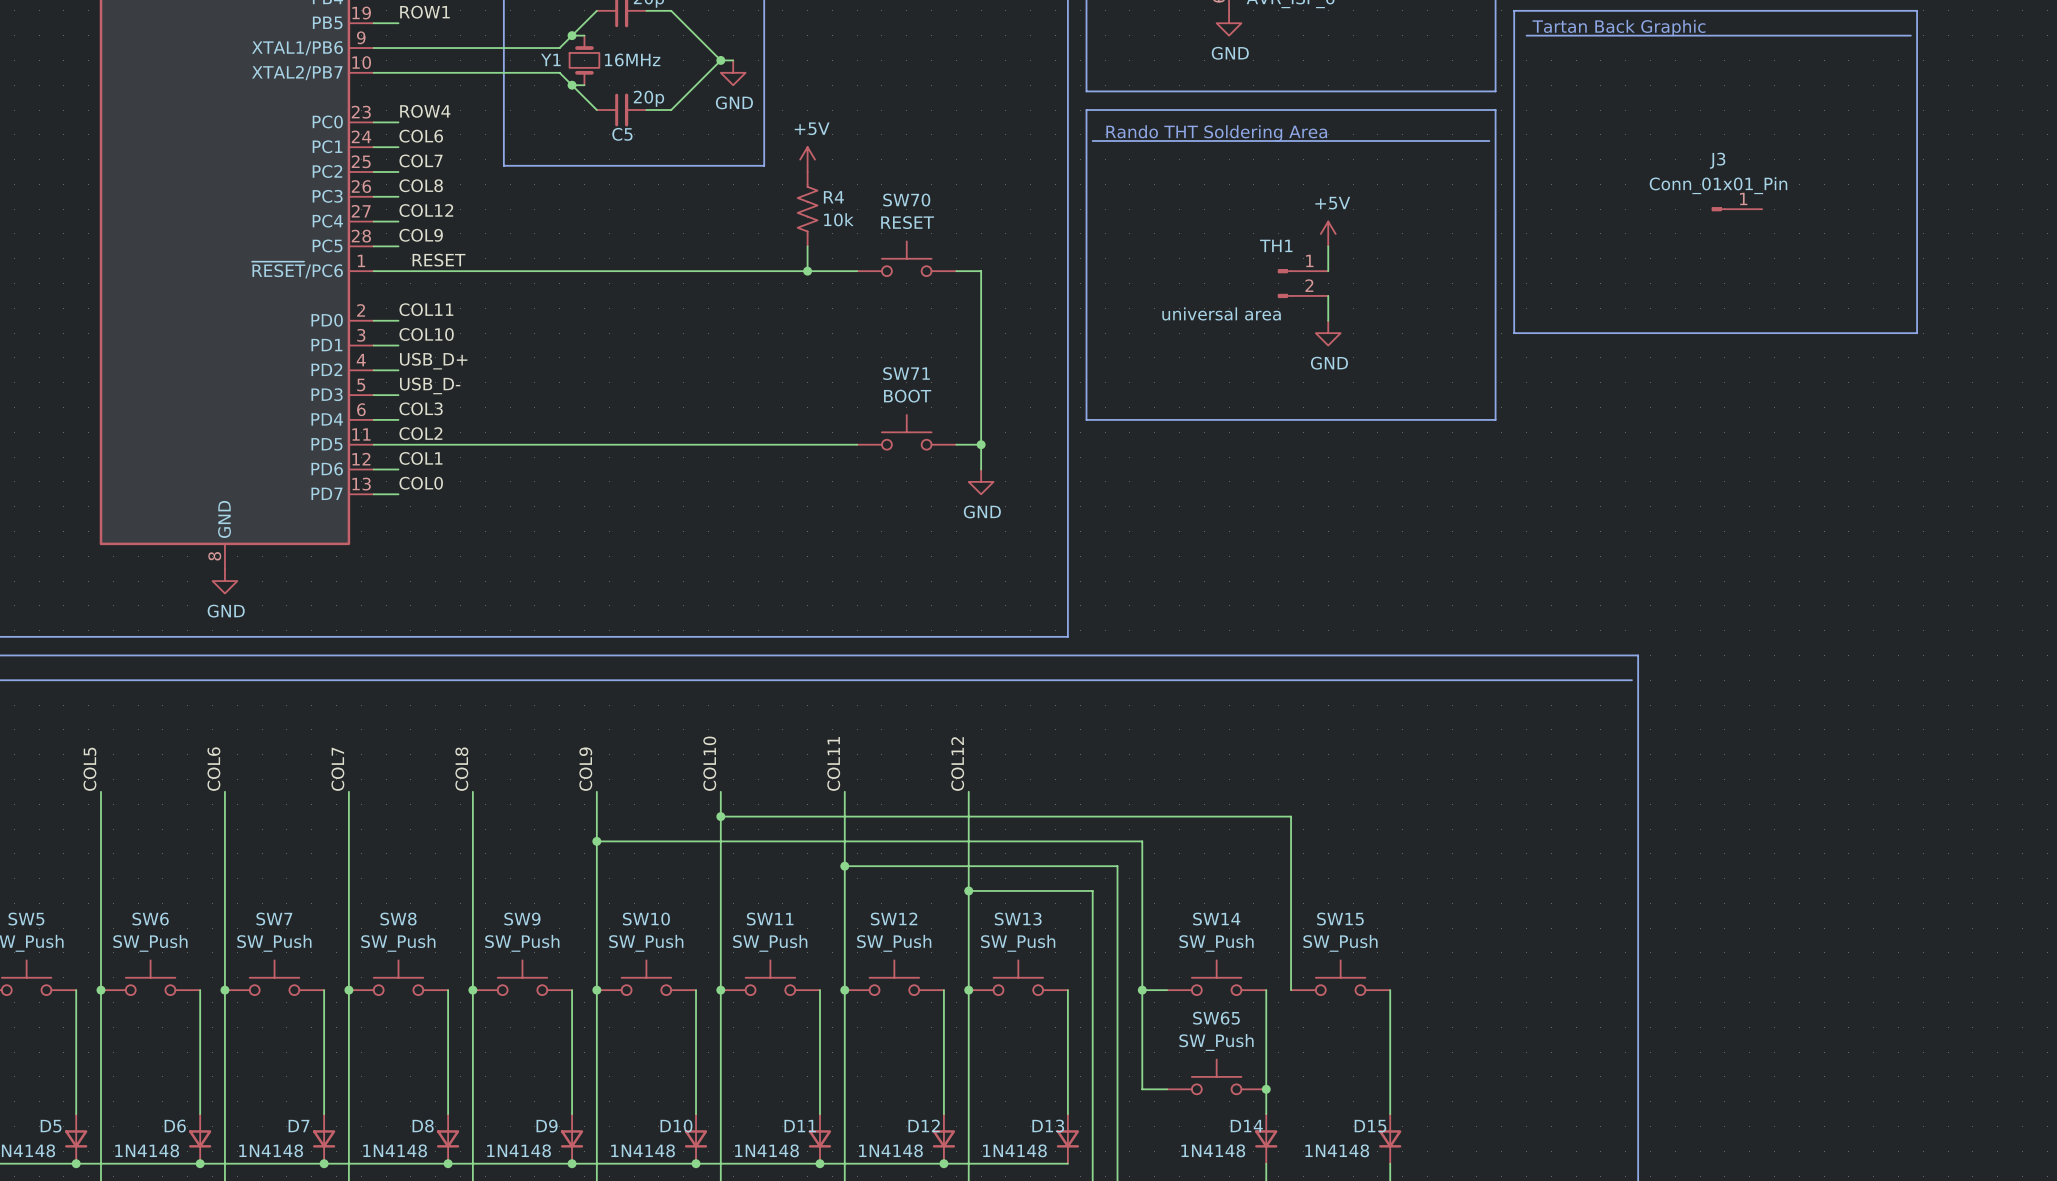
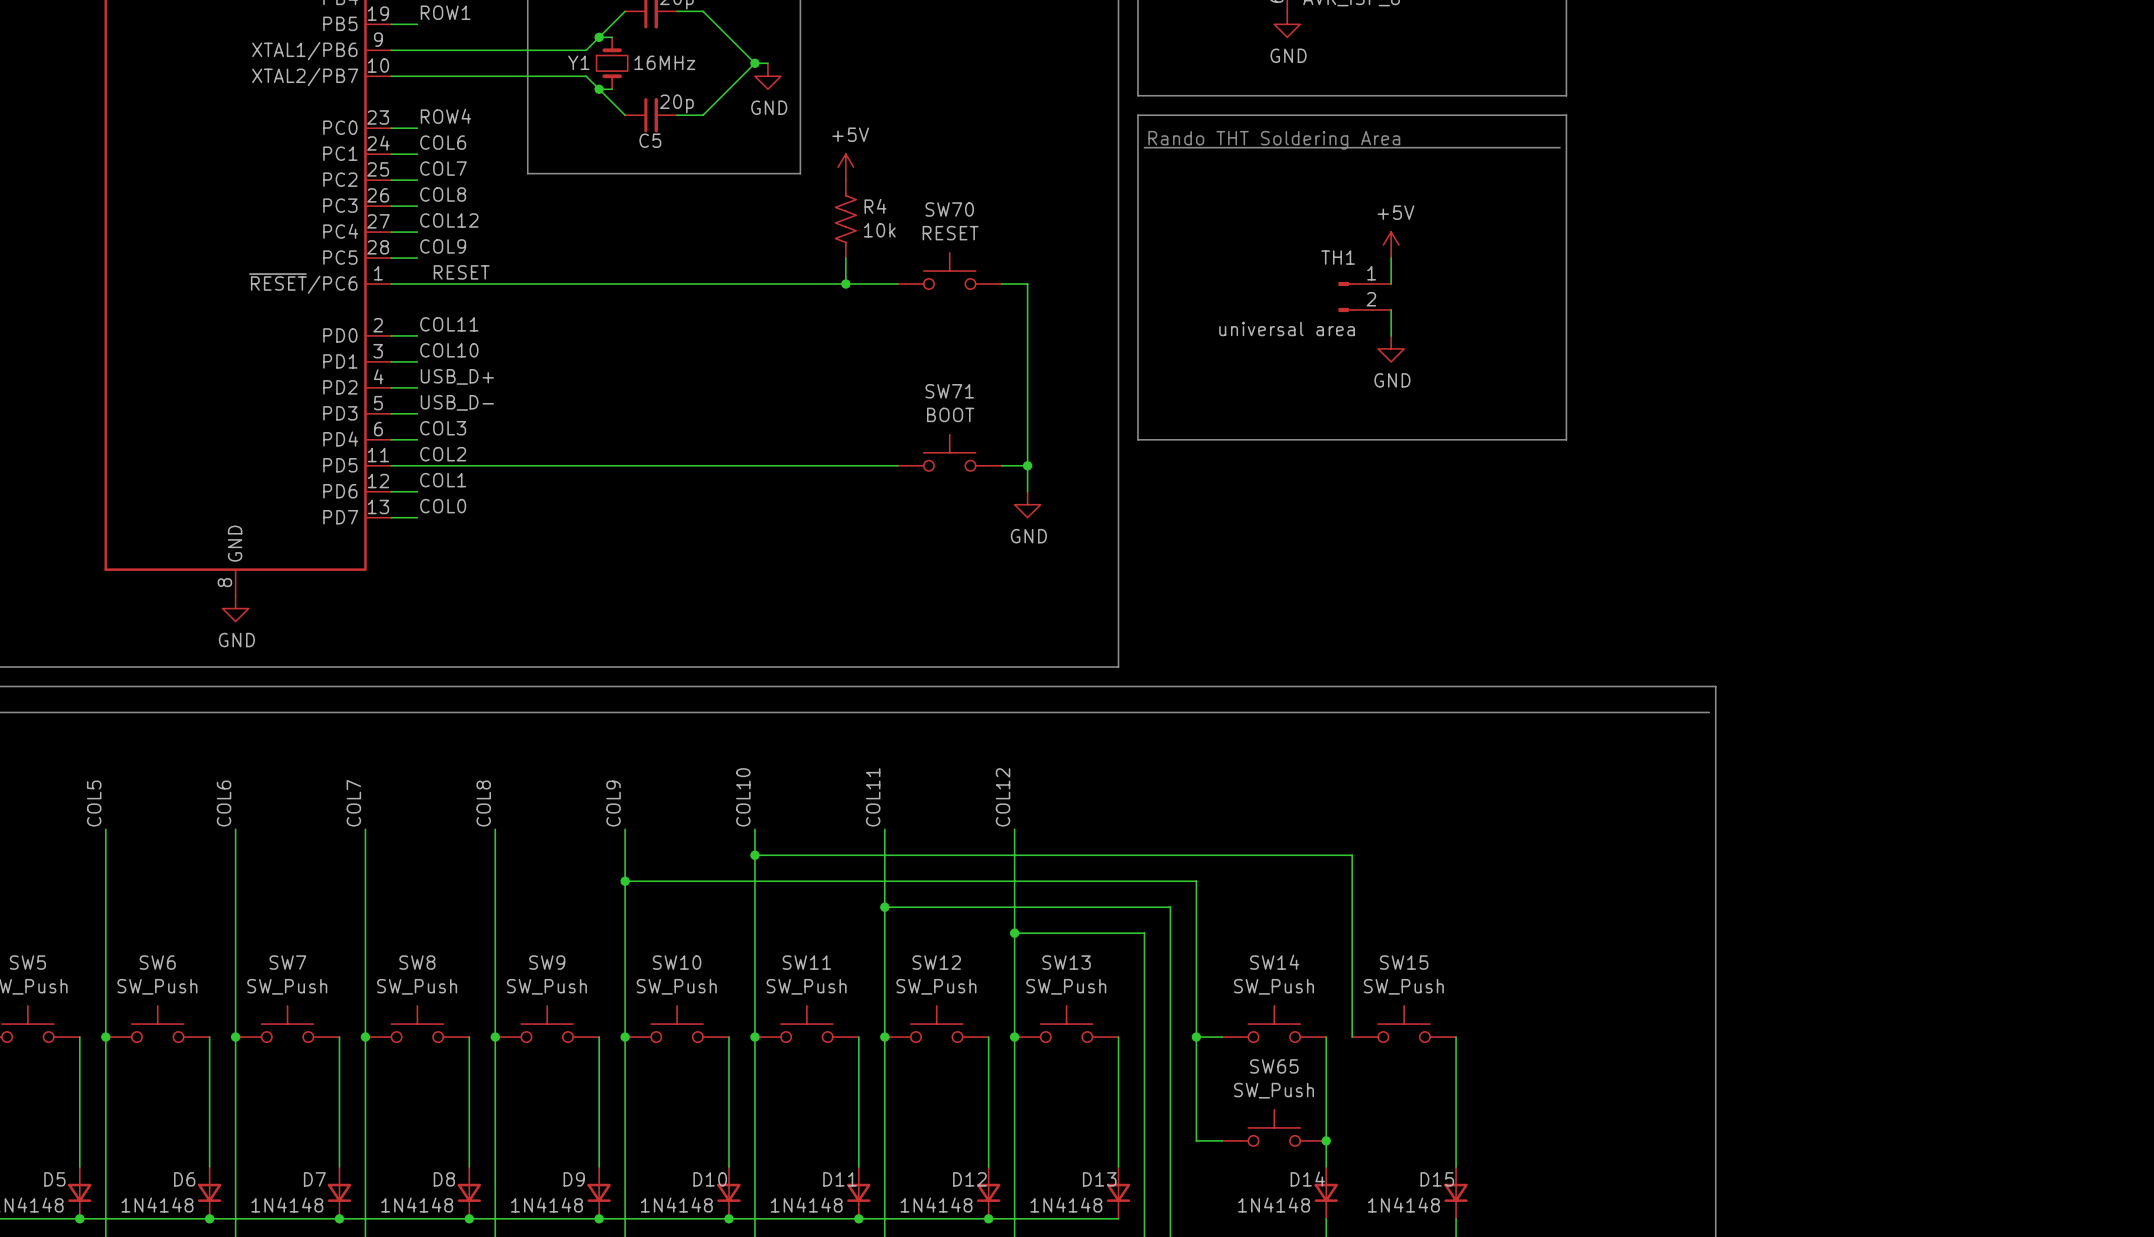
line: (1514, 10) (1917, 10) (1917, 333) (1514, 333) (1514, 10) -> none
text: Tartan Back Graphic (1618, 28) -> none
line: (1526, 35) (1910, 35) -> none
J3: Conn_01x01_Pin (1736, 209) -> none

